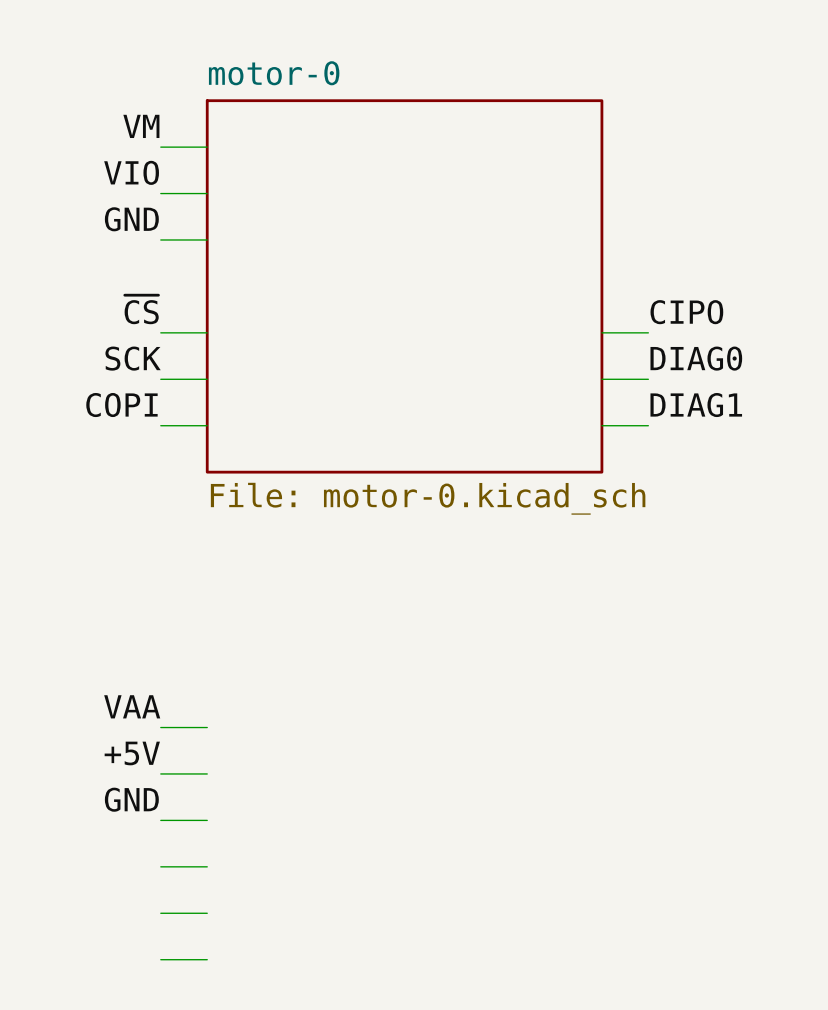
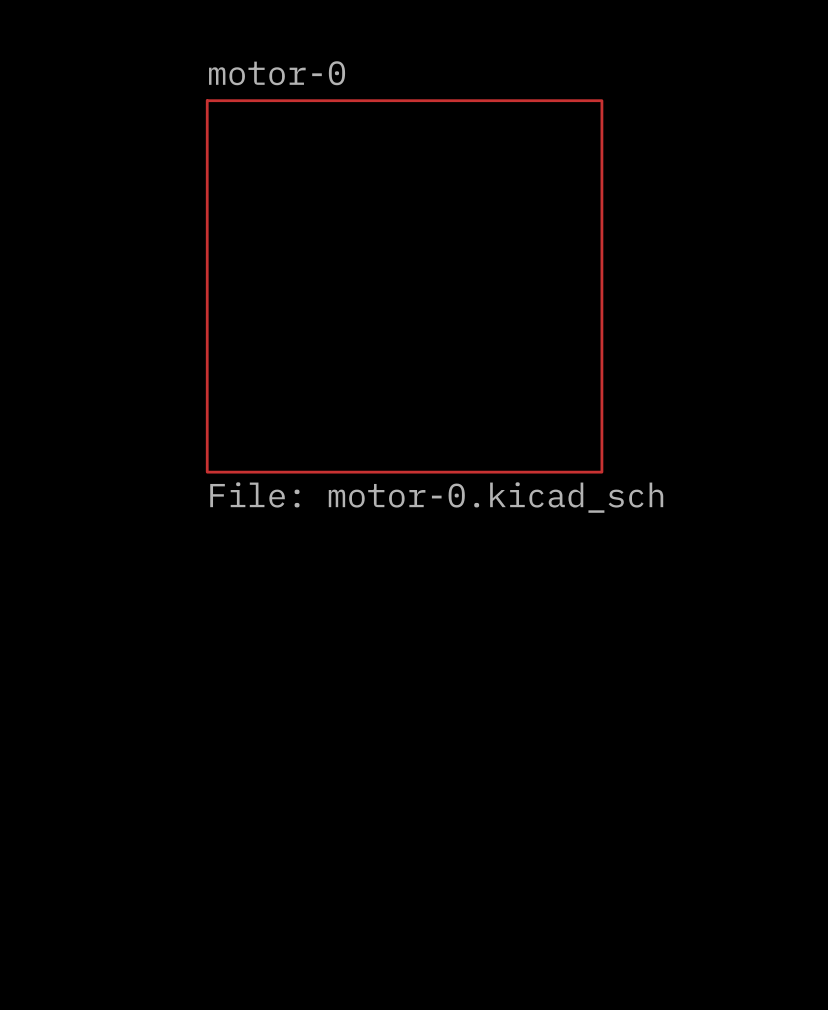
label: VM (141, 126) -> none
wire: (160, 147) (207, 147) -> none
label: VIO (131, 172) -> none
wire: (160, 193) (207, 193) -> none
label: GND (131, 219) -> none
wire: (160, 239) (207, 239) -> none
label: ~{CS} (141, 309) -> none
label: CIPO (686, 312) -> none
wire: (160, 332) (207, 332) -> none
wire: (601, 332) (648, 332) -> none
label: SCK (133, 358) -> none
label: DIAG0 (696, 358) -> none
wire: (160, 379) (207, 379) -> none
wire: (601, 379) (648, 379) -> none
label: COPI (121, 405) -> none
label: DIAG1 (696, 405) -> none
wire: (160, 425) (207, 425) -> none
wire: (601, 425) (648, 425) -> none
label: VAA (132, 706) -> none
wire: (160, 727) (207, 727) -> none
label: +5V (132, 753) -> none
wire: (160, 773) (207, 773) -> none
label: GND (131, 799) -> none
wire: (160, 820) (207, 820) -> none
wire: (160, 866) (207, 866) -> none
wire: (160, 913) (207, 913) -> none
wire: (160, 959) (207, 959) -> none

